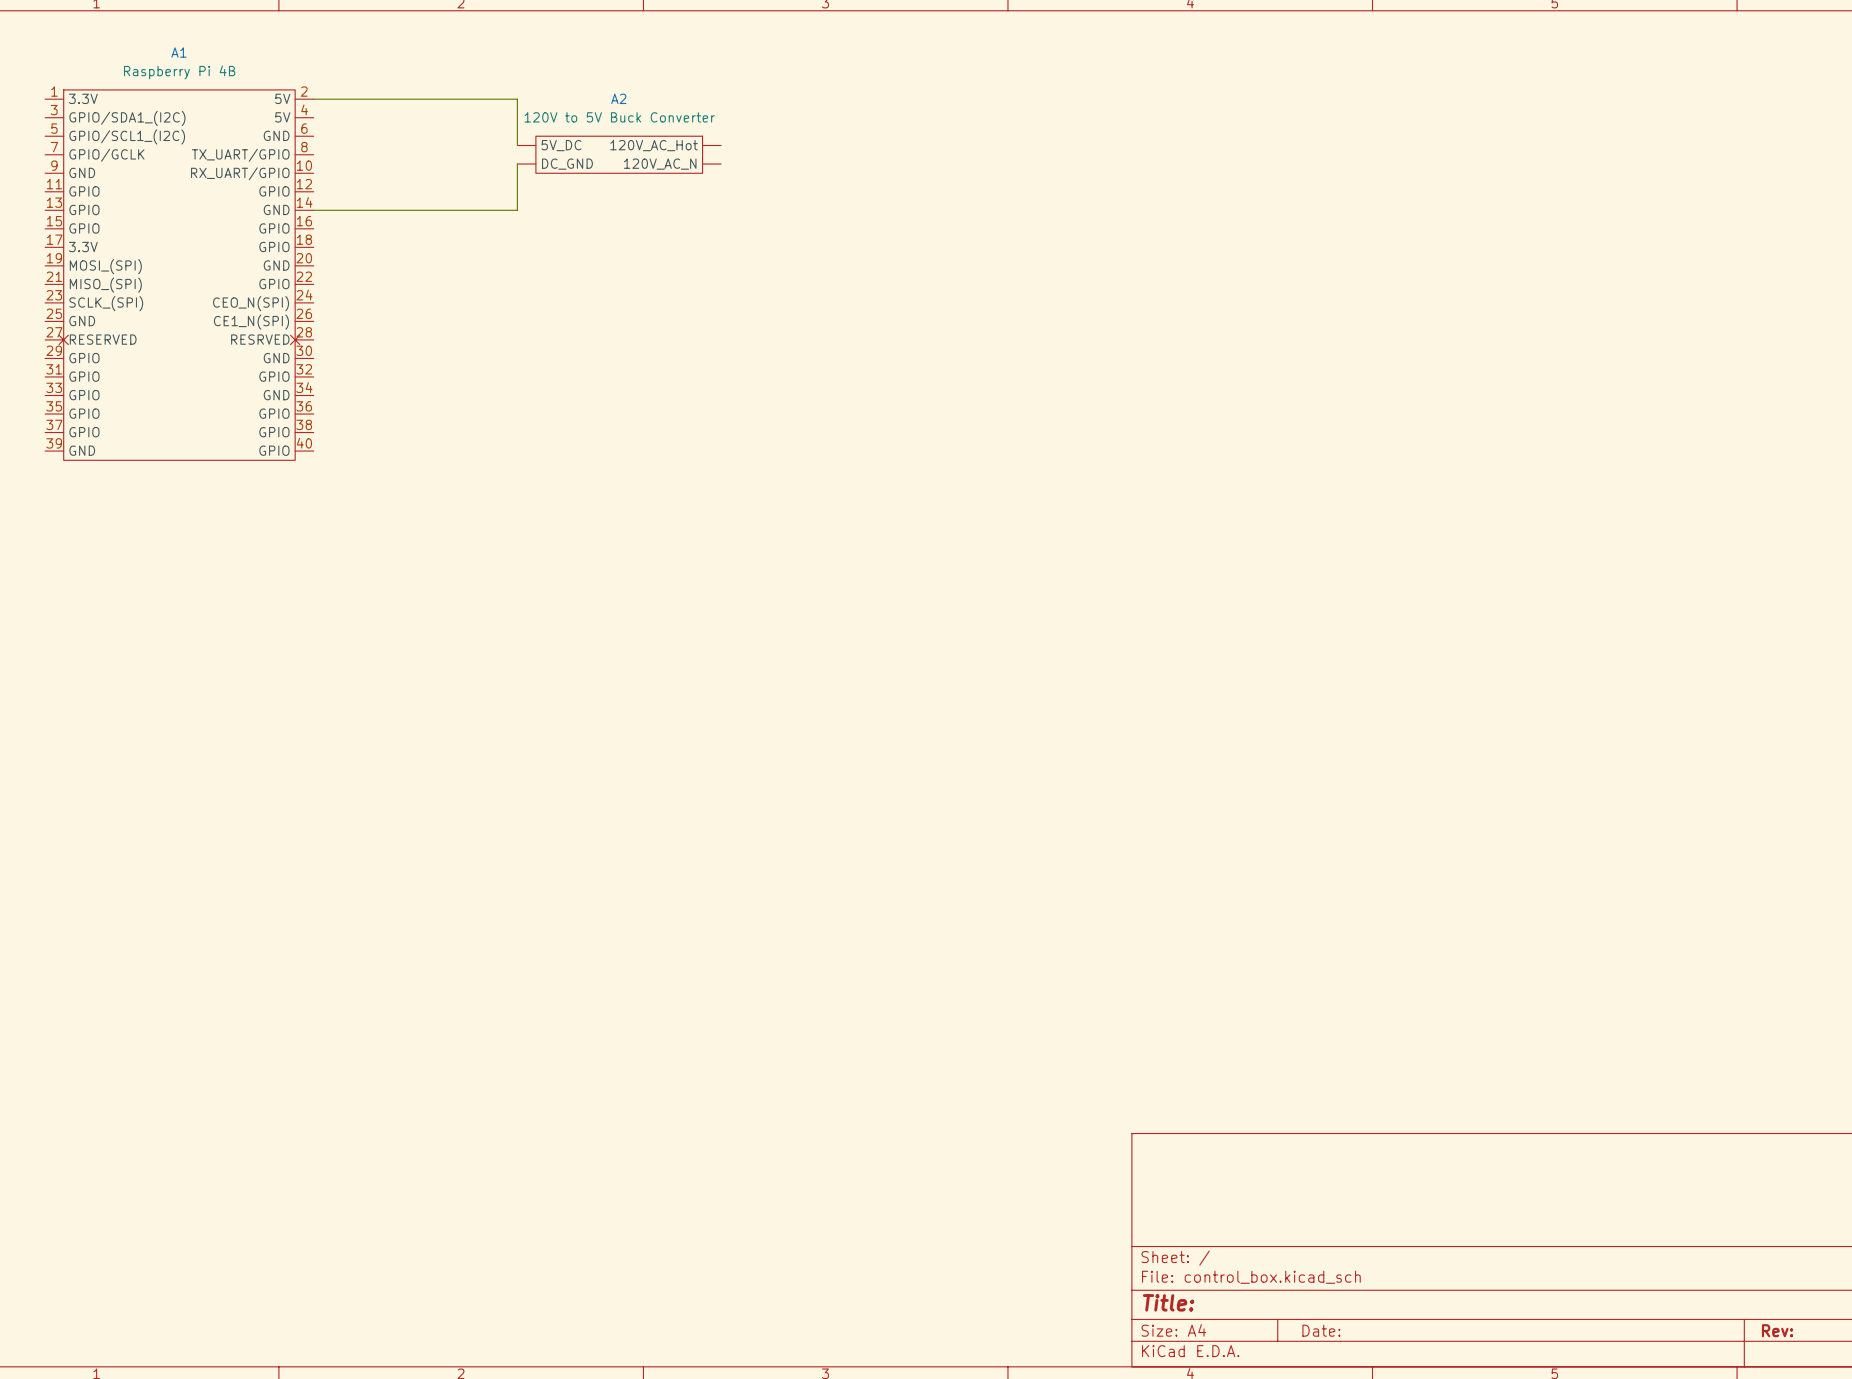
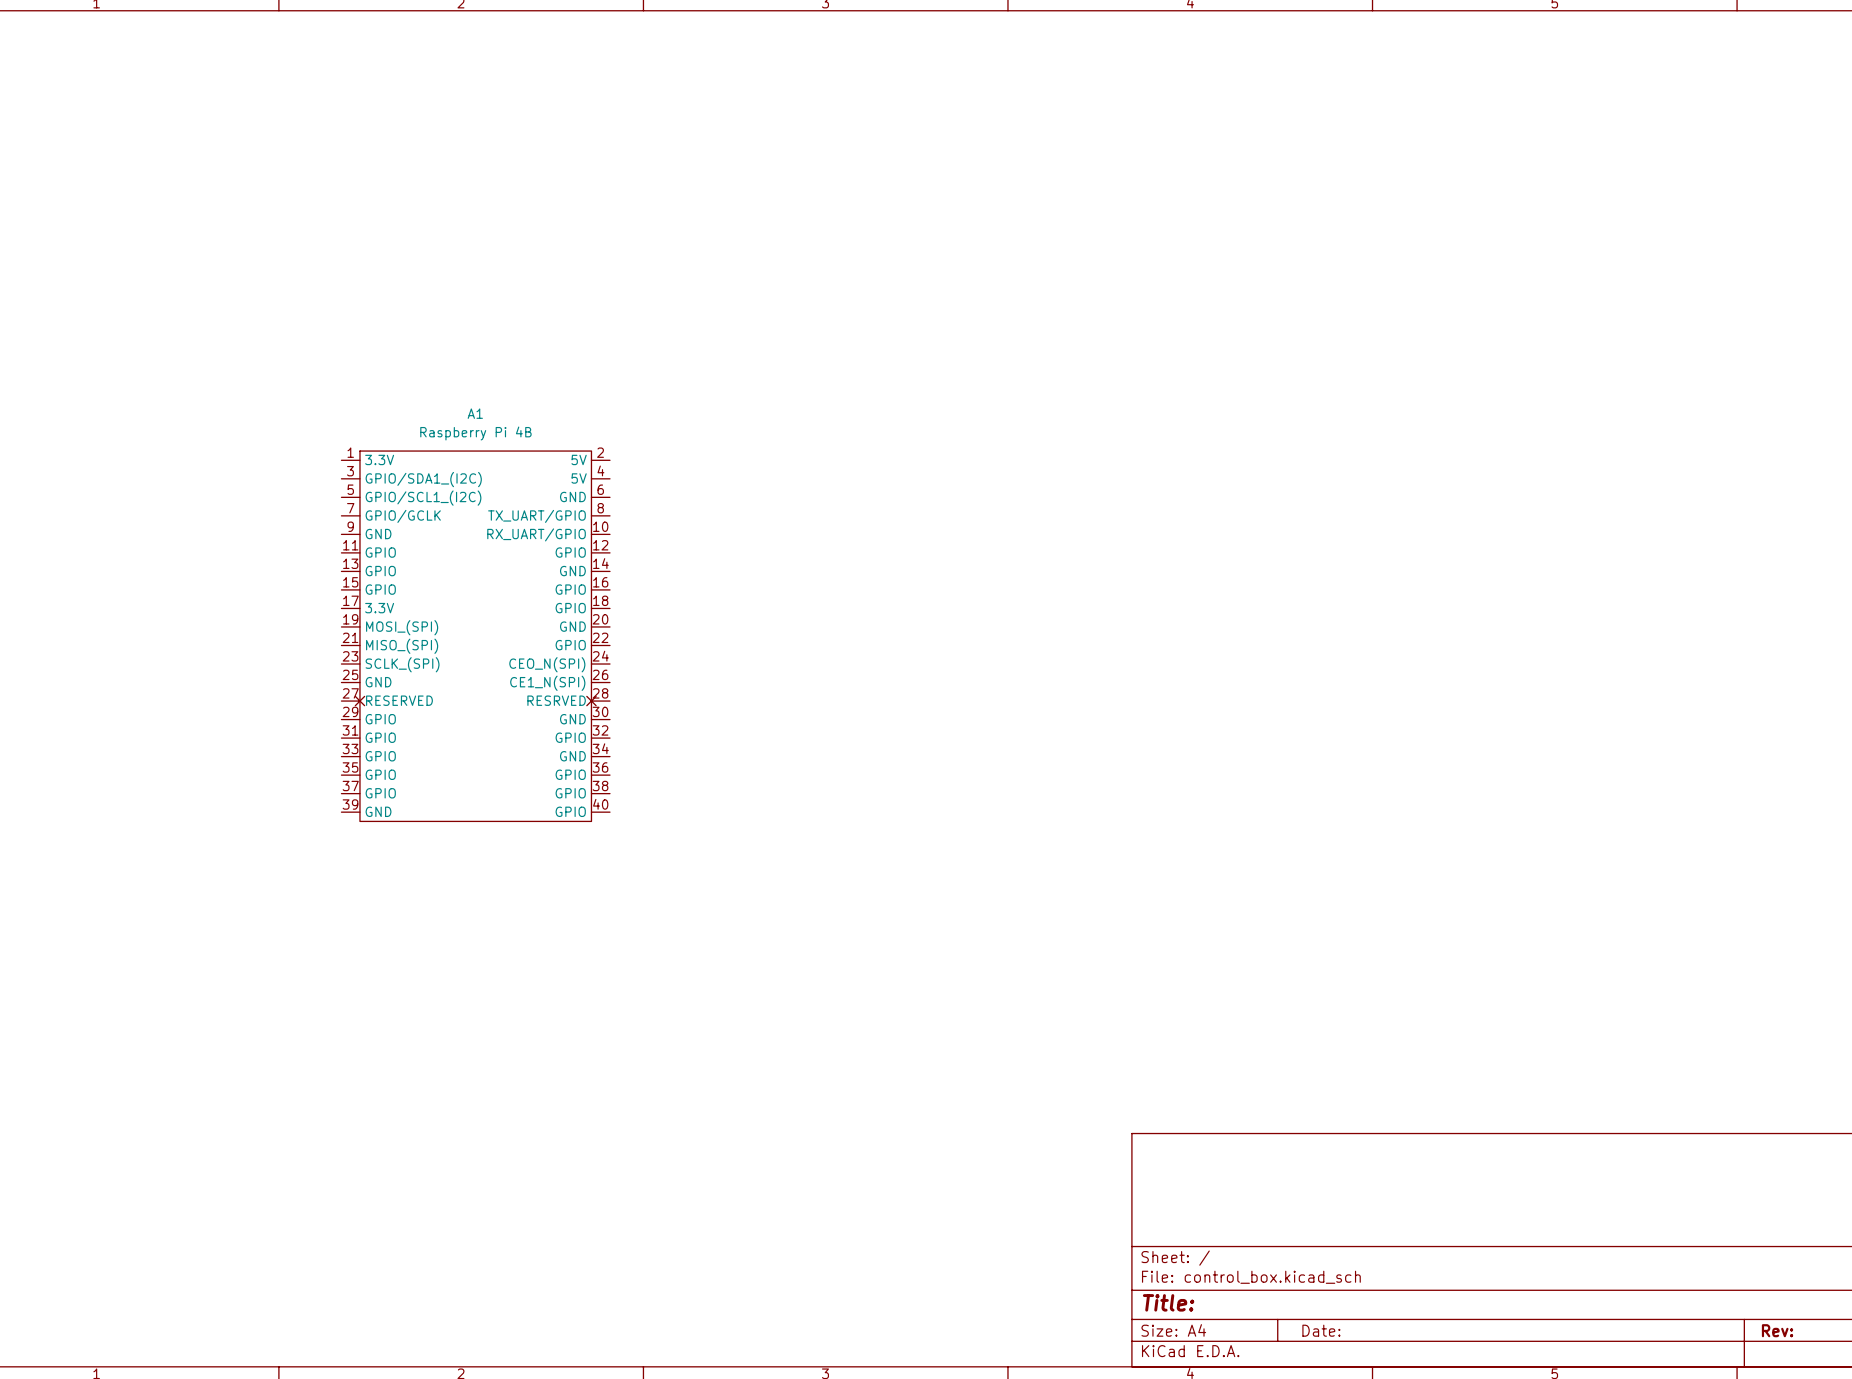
wire: (313, 99) (517, 99) (517, 145) -> none
A2: 120V to 5V Buck Converter (619, 154) -> none
wire: (517, 164) (517, 210) (313, 210) -> none
A1 position: (179, 275) -> (475, 636)

